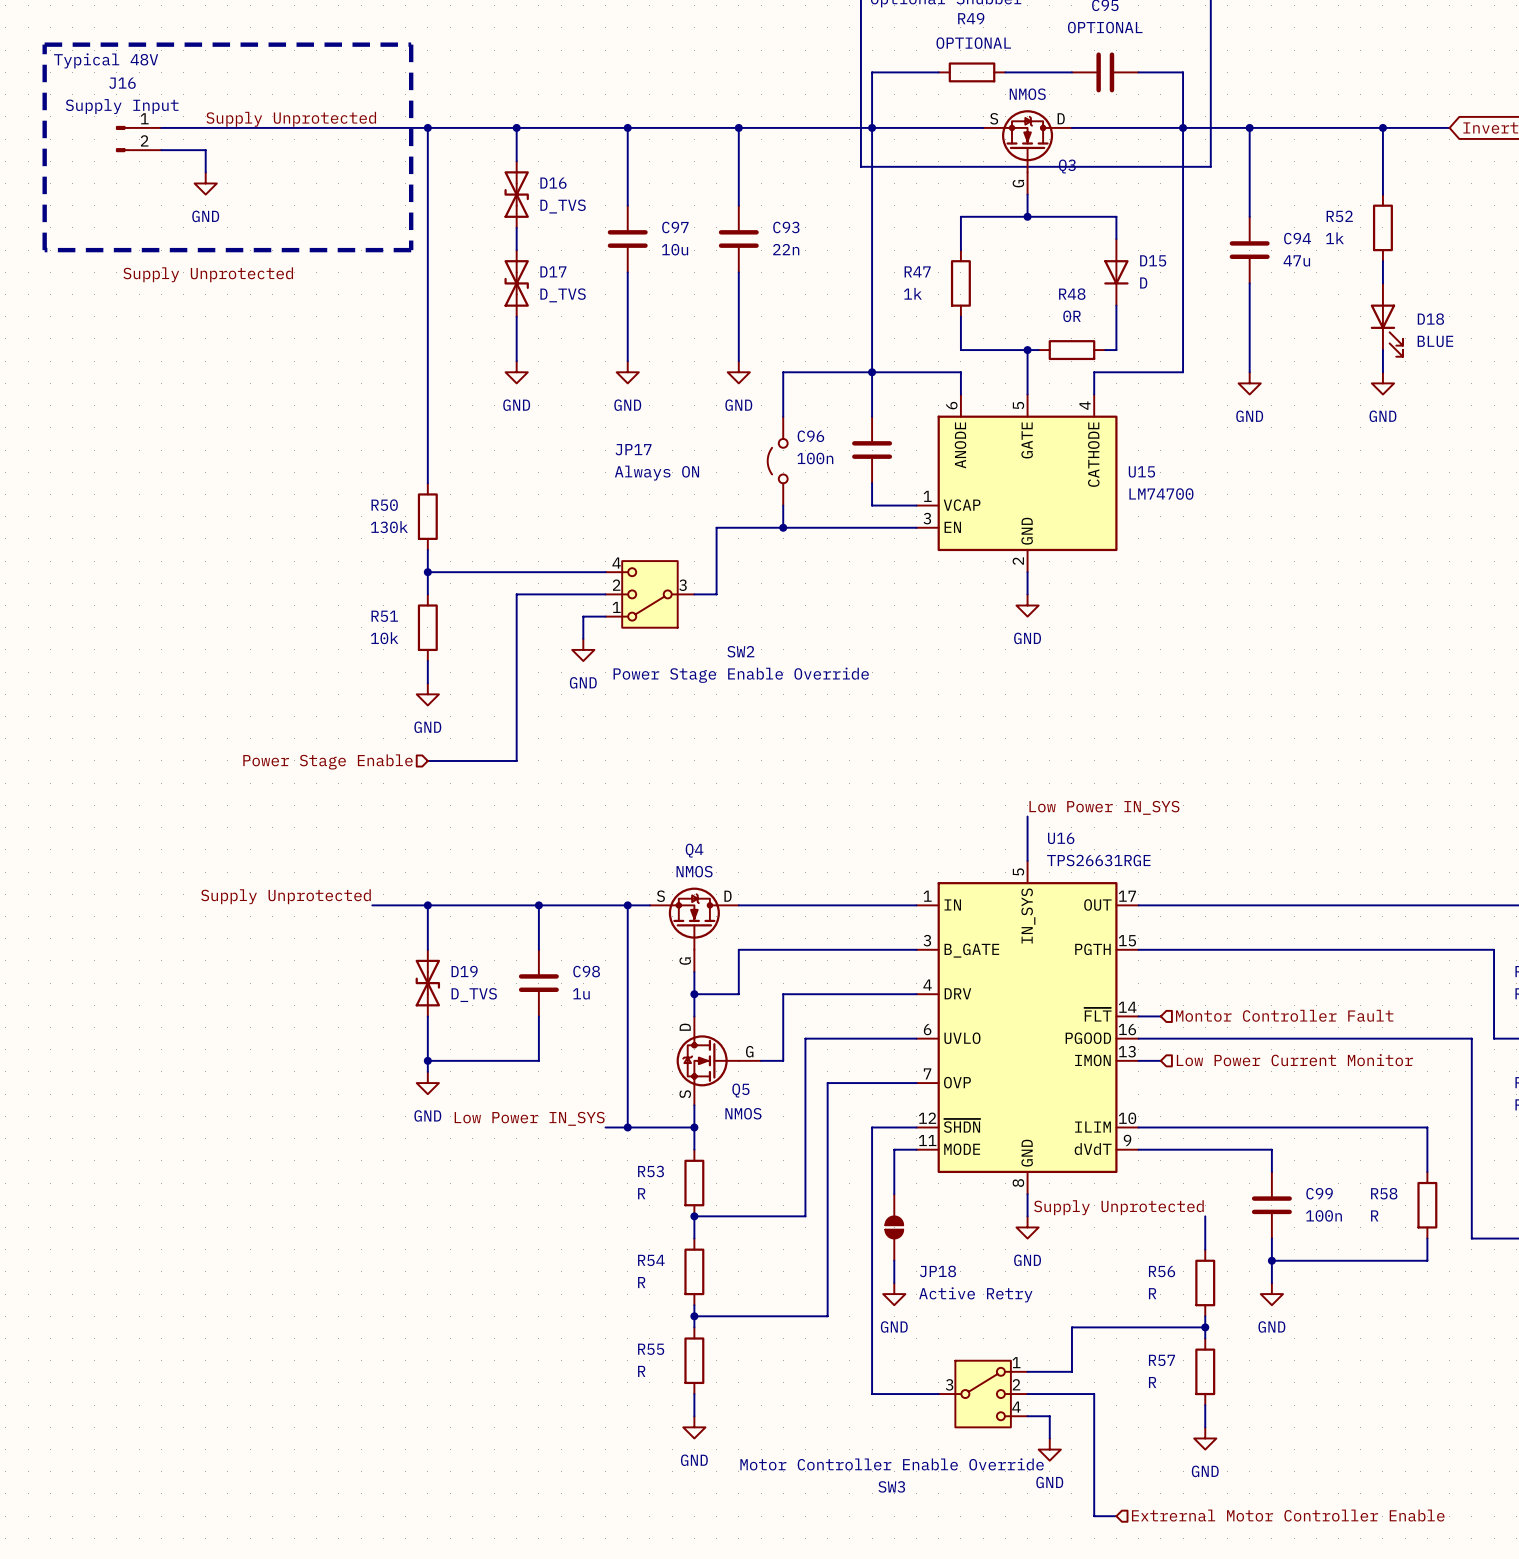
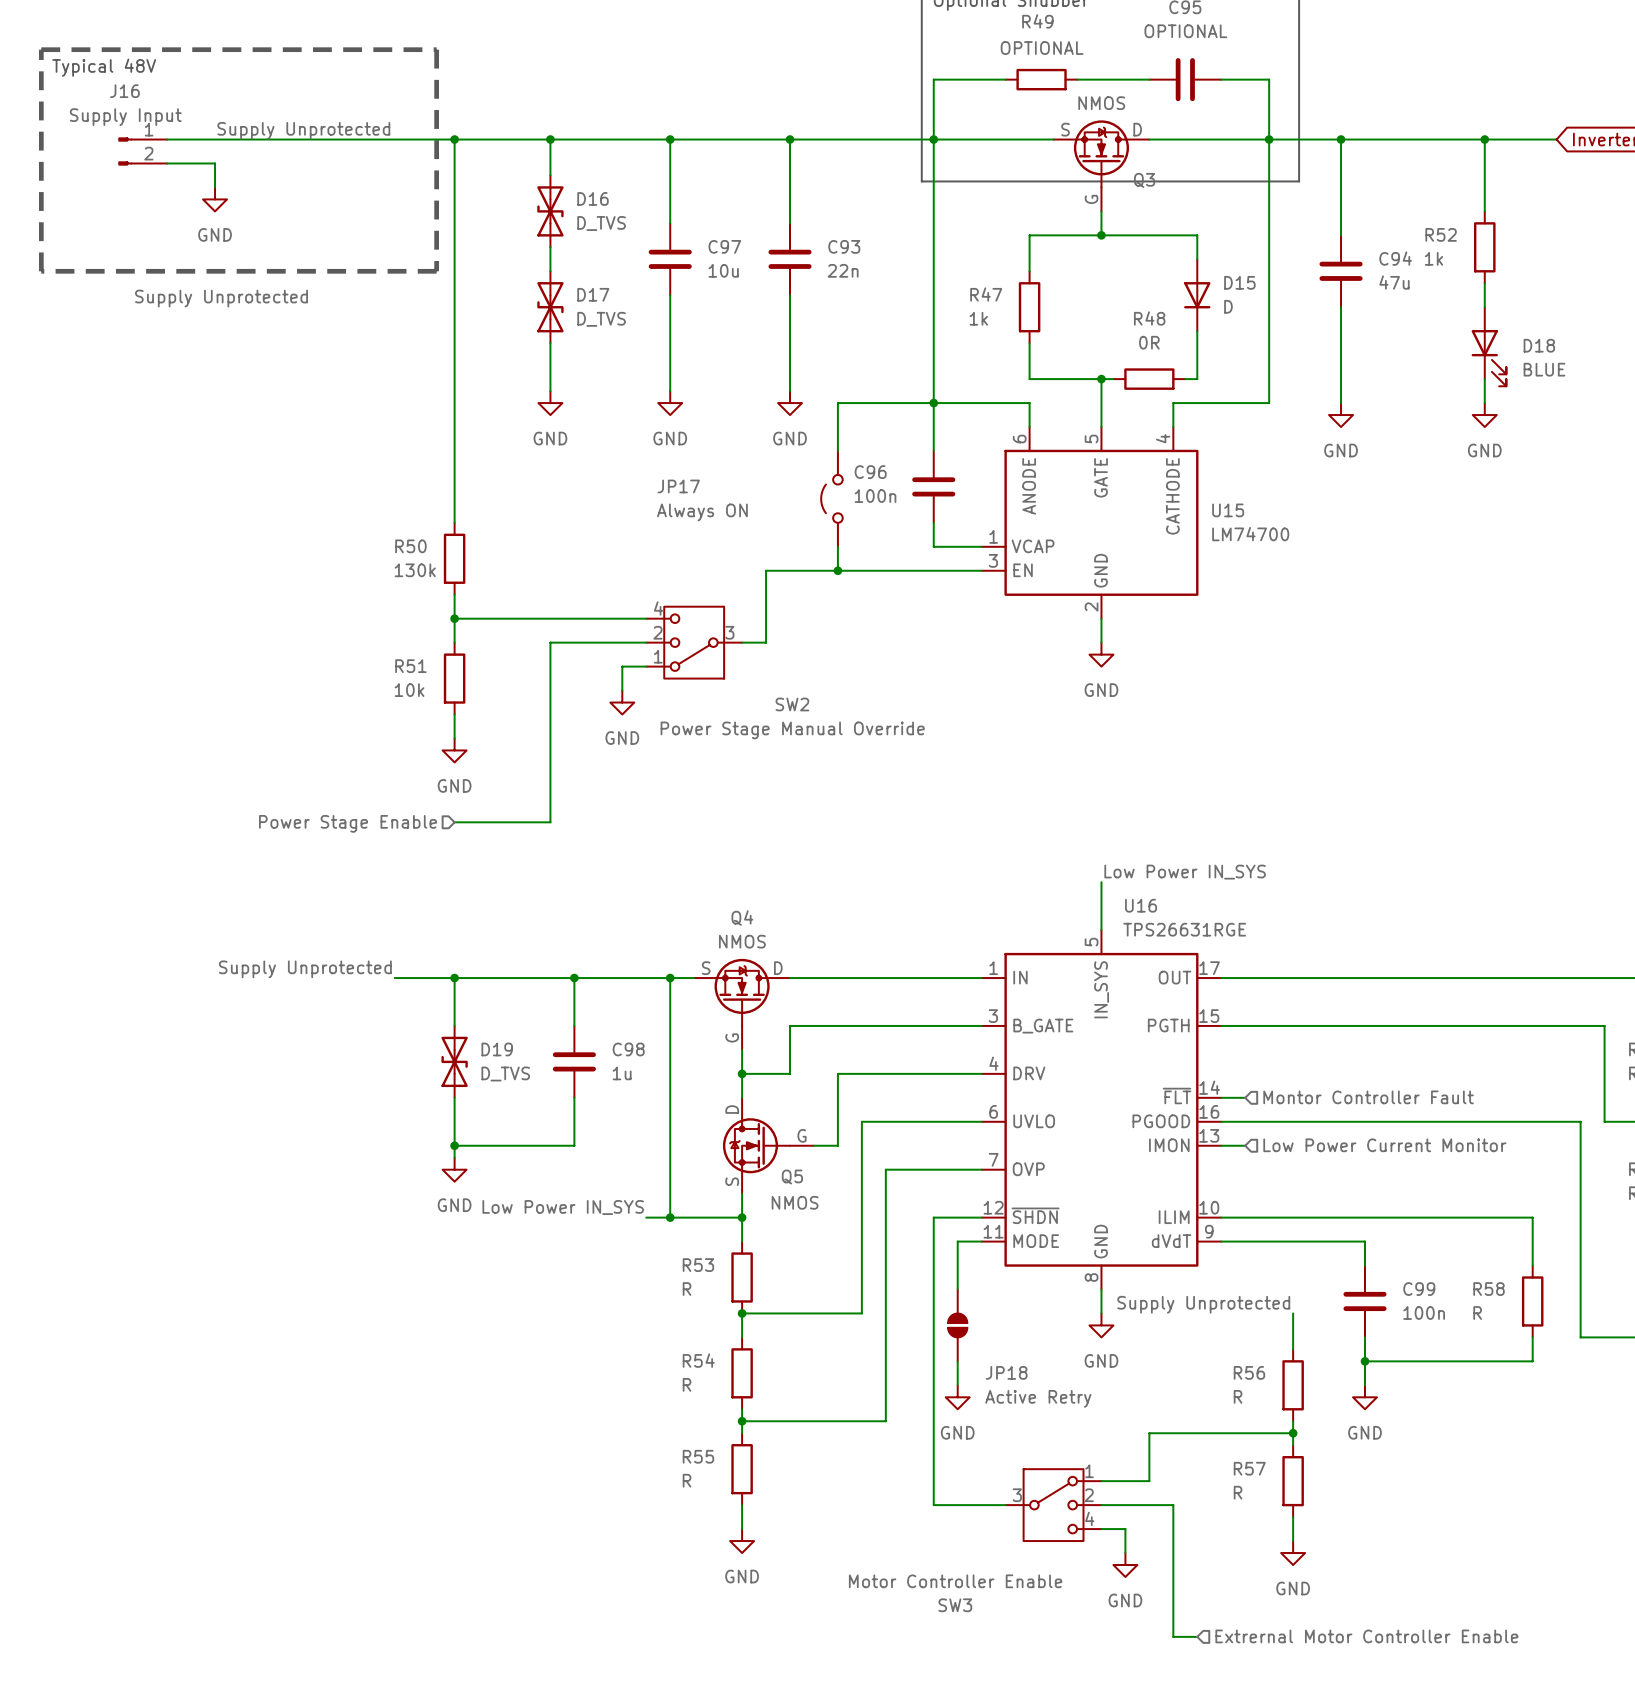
SW2 value: Power Stage Enable Override (741, 675) -> Power Stage Manual Override (792, 730)
SW3 value: Motor Controller Enable Override (892, 1464) -> Motor Controller Enable (955, 1581)

